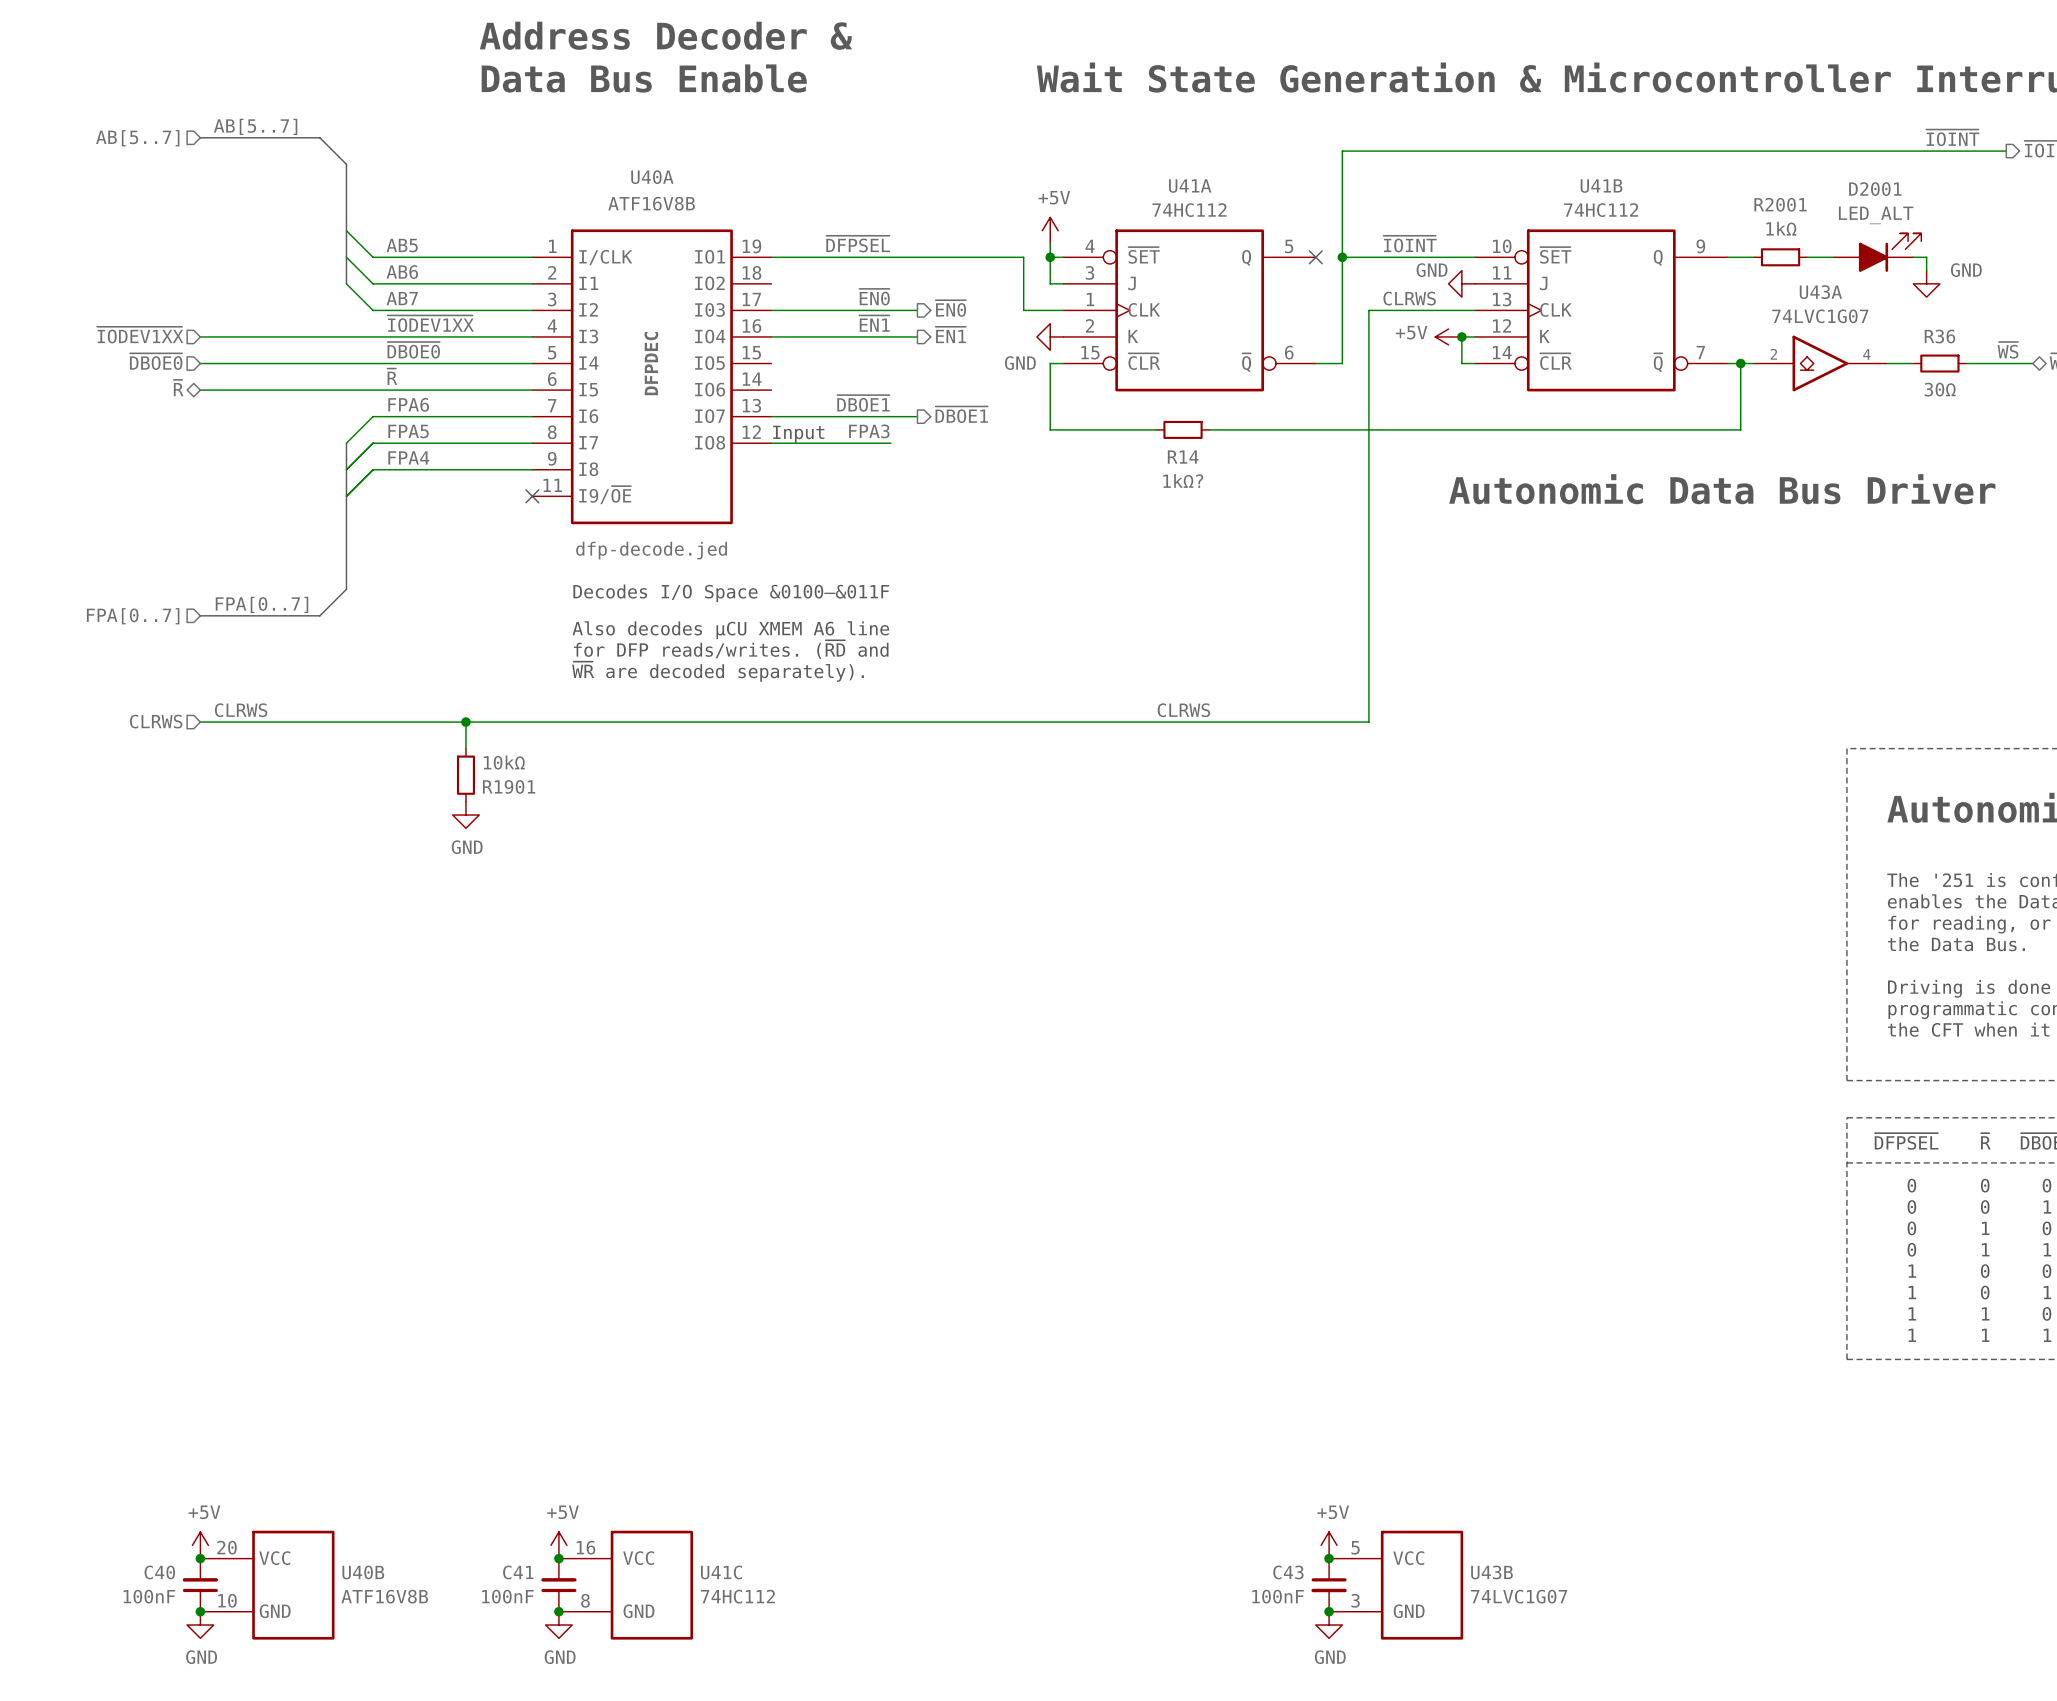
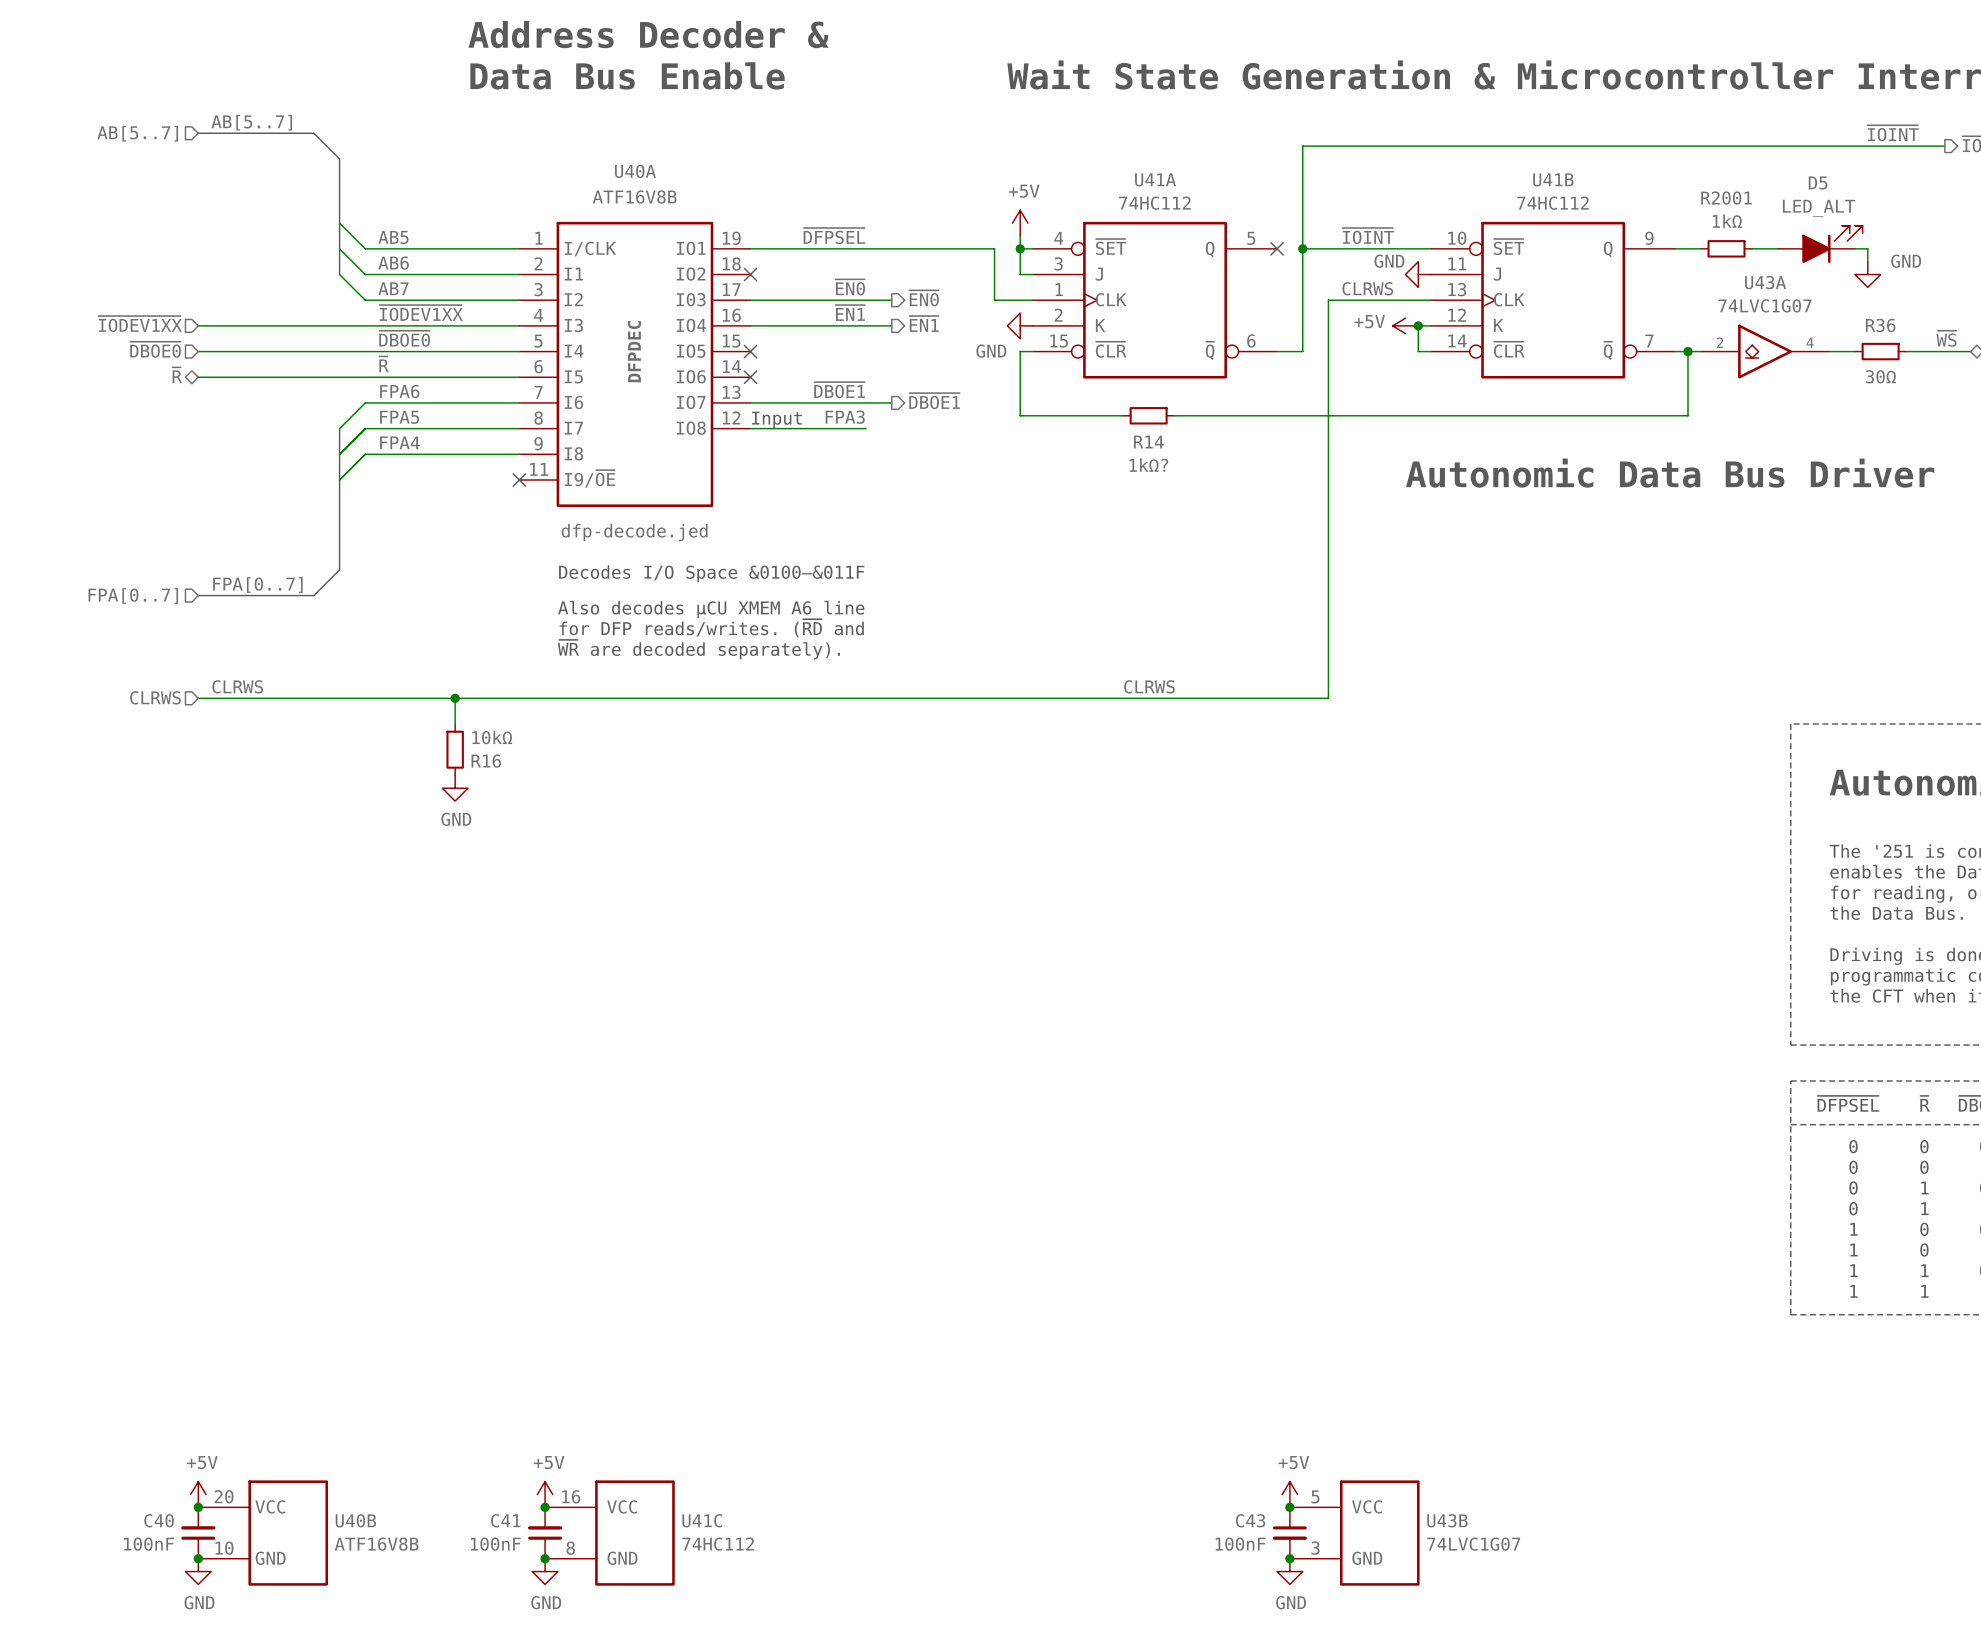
D2001 name: D2001 (1875, 189) -> D5 (1818, 182)
no-connect mark: none -> (750, 274)
no-connect mark: none -> (750, 351)
no-connect mark: none -> (750, 377)
R1901 name: R1901 (509, 786) -> R16 (486, 761)

